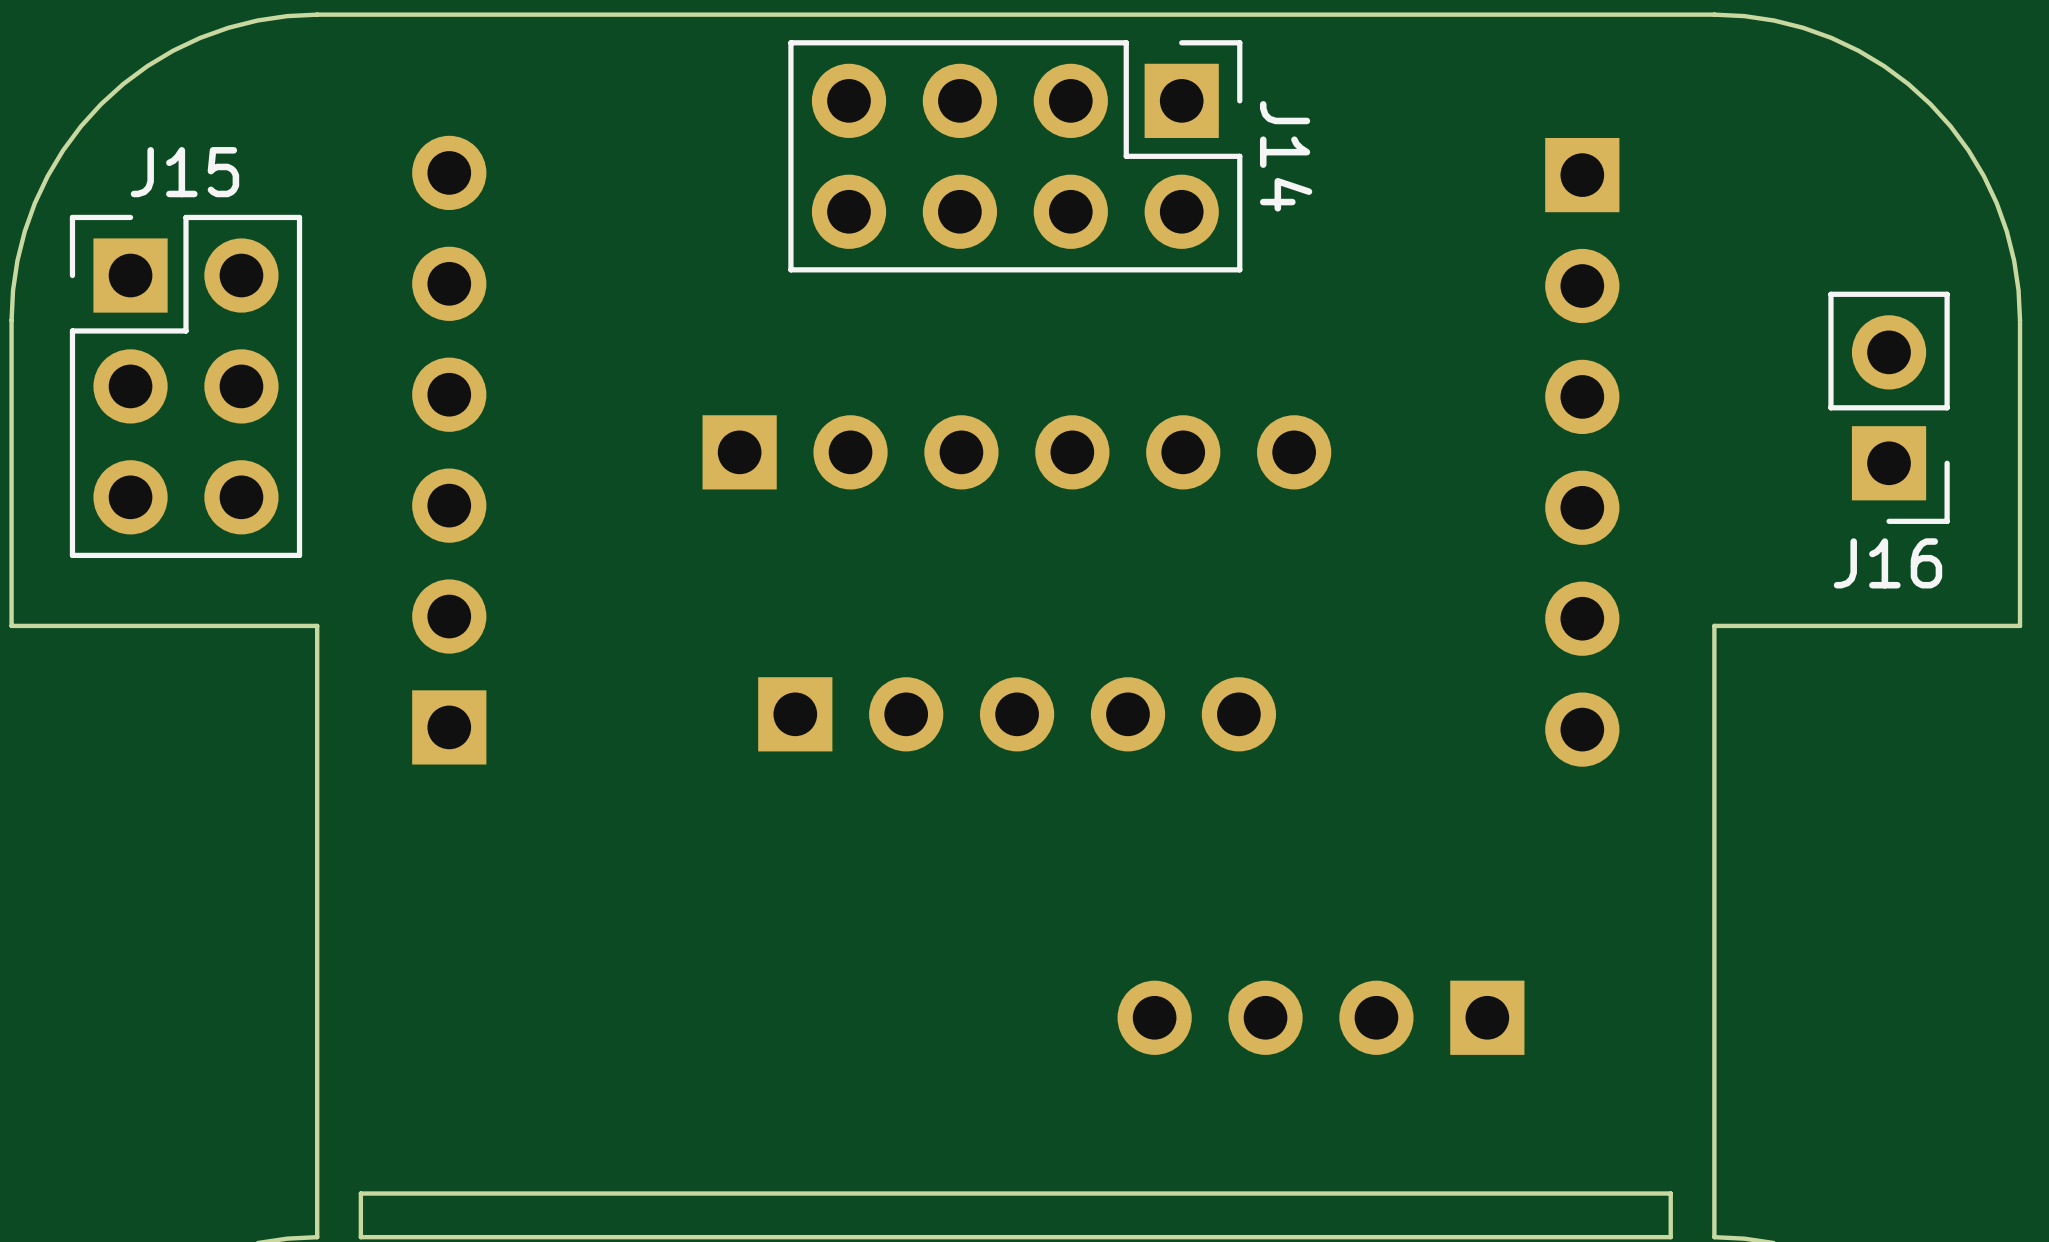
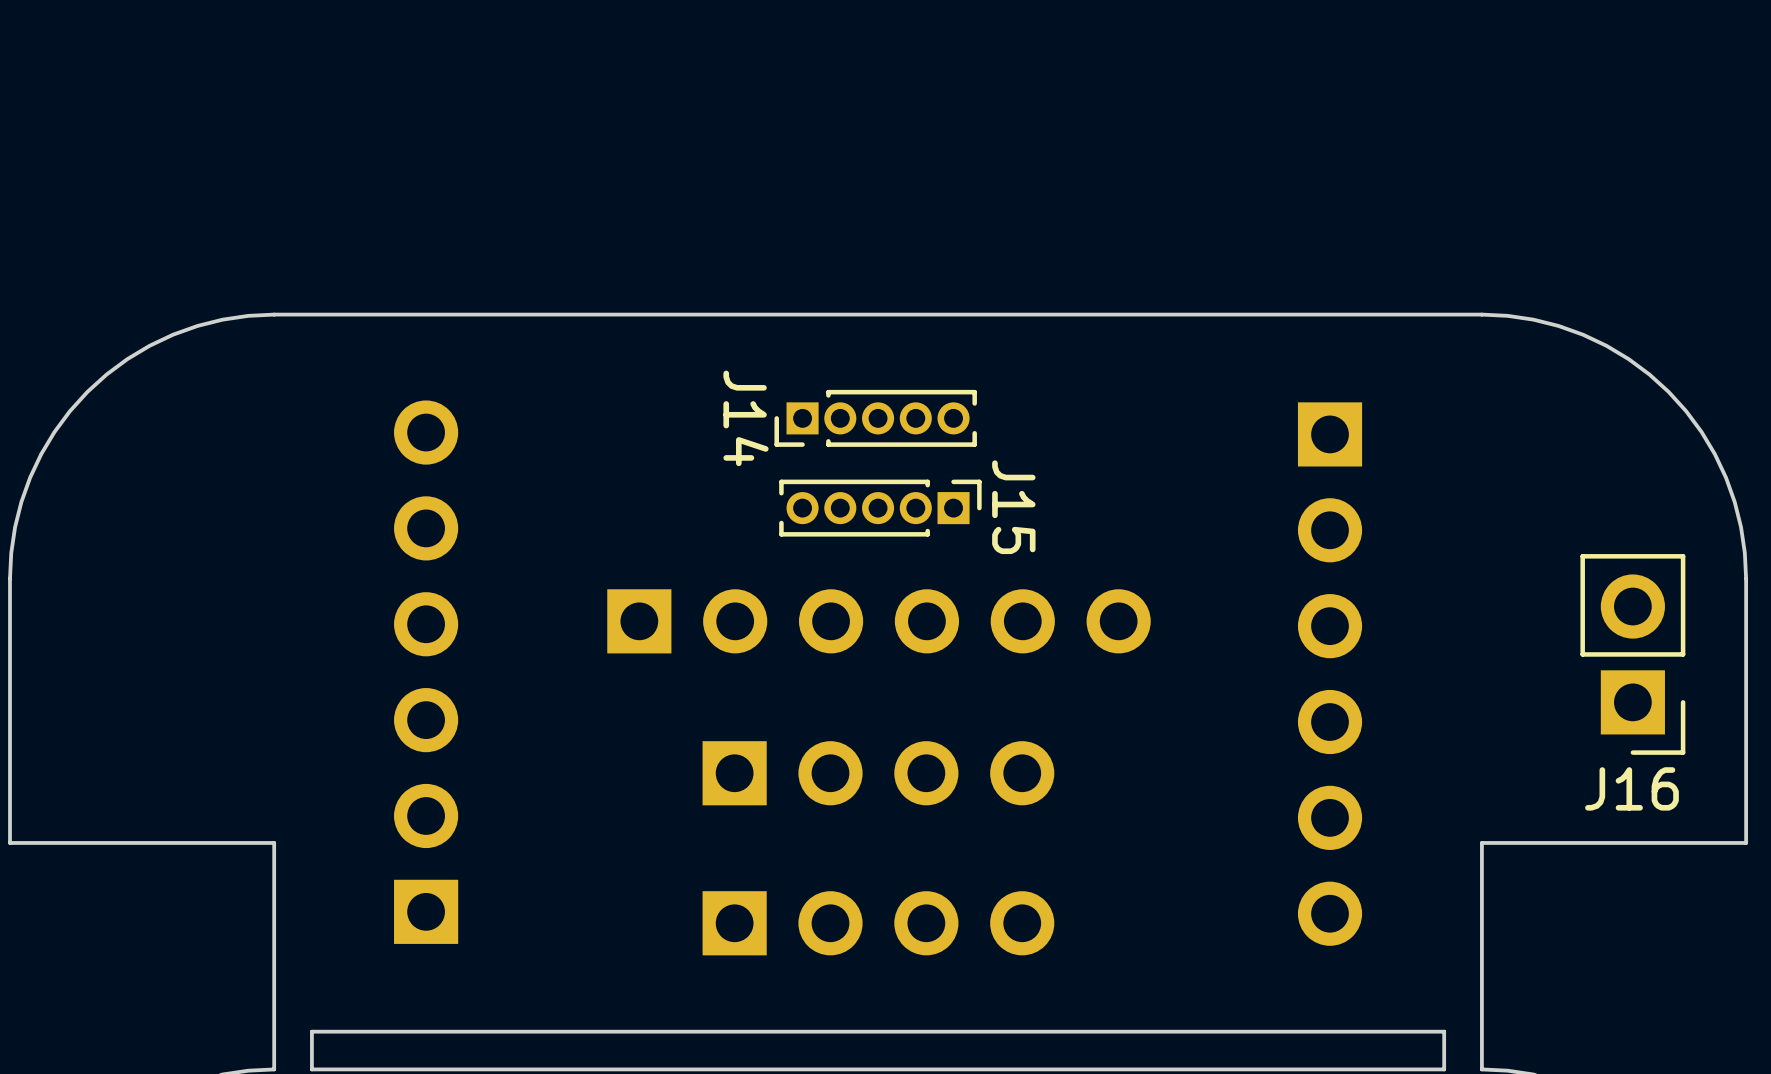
J14 footprint: [788, 40, 1243, 273] -> [774, 389, 977, 447]
J14 name position: J14 (1286, 156) -> J14 (746, 418)
J15 name position: J15 (184, 172) -> J15 (1013, 507)
J15 footprint: [69, 214, 303, 559] -> [779, 479, 982, 537]
J16 position: (1889, 407) -> (1632, 654)
part: (449, 450) -> none
part: (1016, 452) -> none
part: (1582, 452) -> none
part footprint: [758, 677, 1277, 752] -> [607, 589, 1151, 654]
part: none -> (426, 672)
part: none -> (1330, 674)
part: none -> (878, 773)
board edge: (1714, 975) (1714, 625) (2020, 625) (2018, 290) (2006, 231) (1983, 176) (1950, 126) (1908, 84) (1884, 66) (1831, 37) (1803, 27) (1744, 16) (1714, 14) (317, 14) (287, 16) (228, 27) (200, 37) (147, 66) (101, 104) (63, 150) (34, 203) (17, 260) (11, 320) (11, 625) (317, 625) (317, 975) -> (1481, 842) (1746, 842) (1746, 578) (1741, 527) (1726, 477) (1701, 432) (1668, 391) (1628, 359) (1583, 334) (1533, 319) (1481, 314) (274, 314) (222, 319) (173, 334) (127, 359) (87, 391) (54, 432) (30, 477) (21, 502) (11, 552) (9, 578) (9, 842) (274, 842)
part: (1320, 1017) -> none
part: none -> (878, 923)

